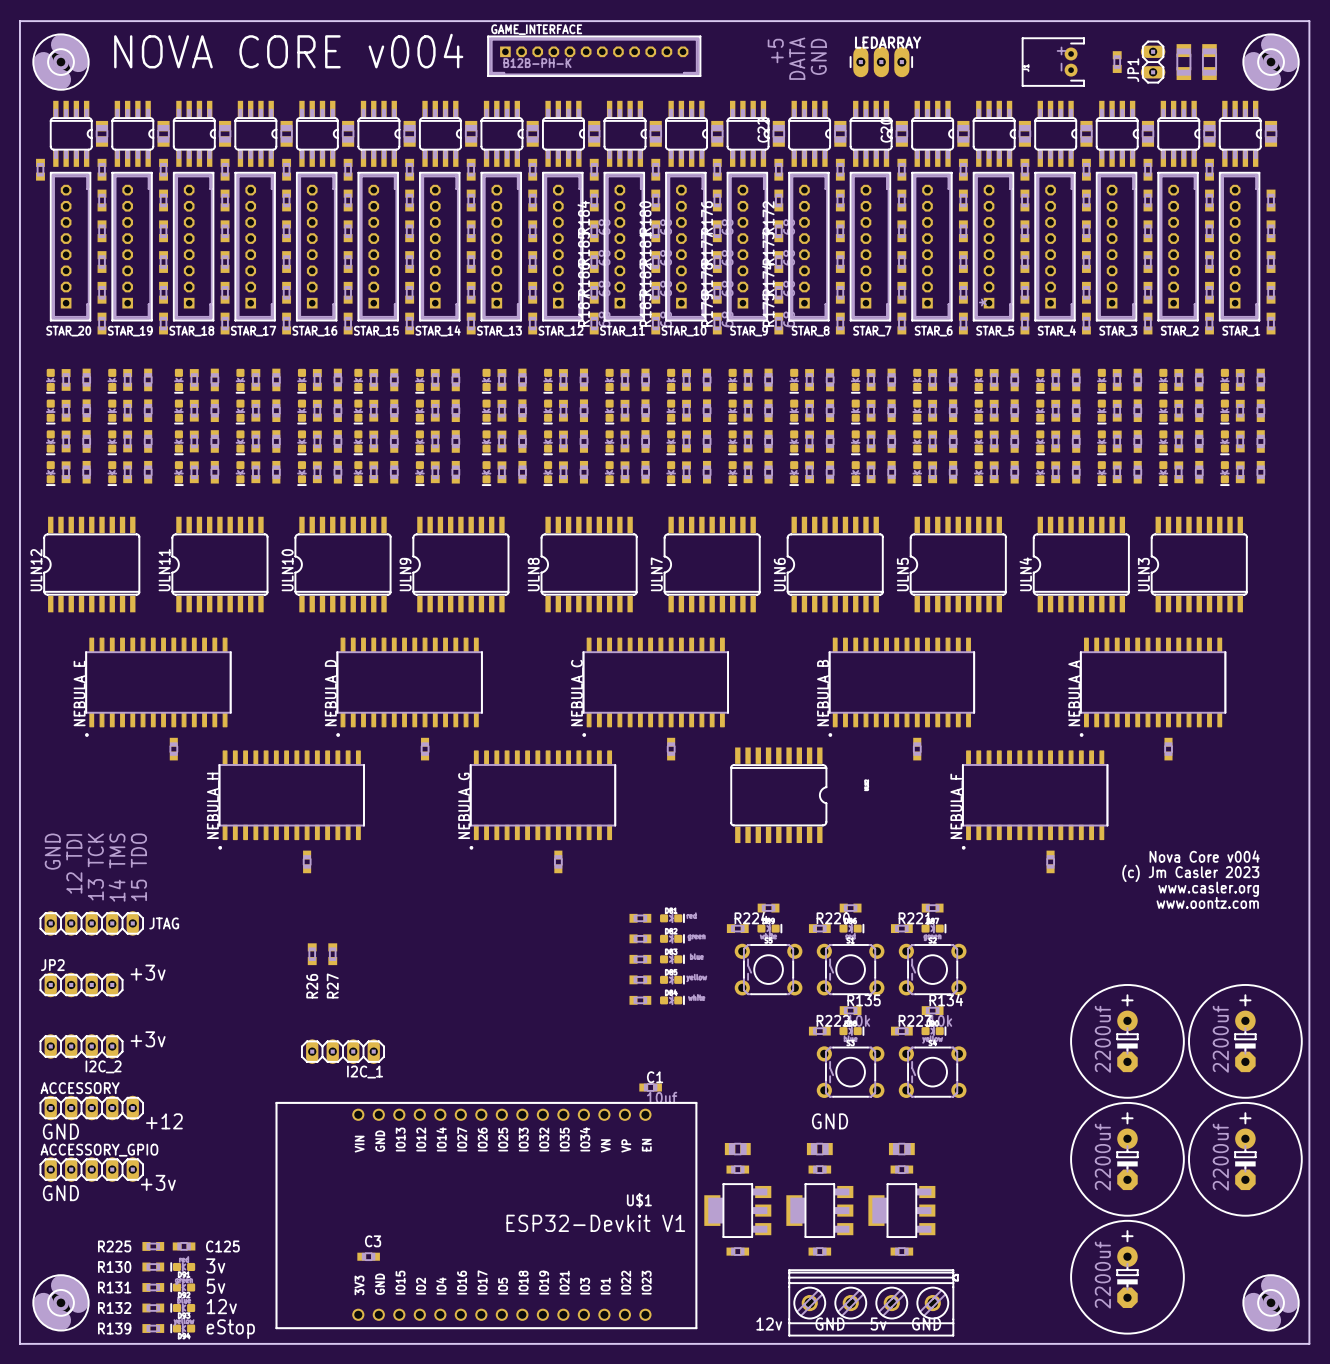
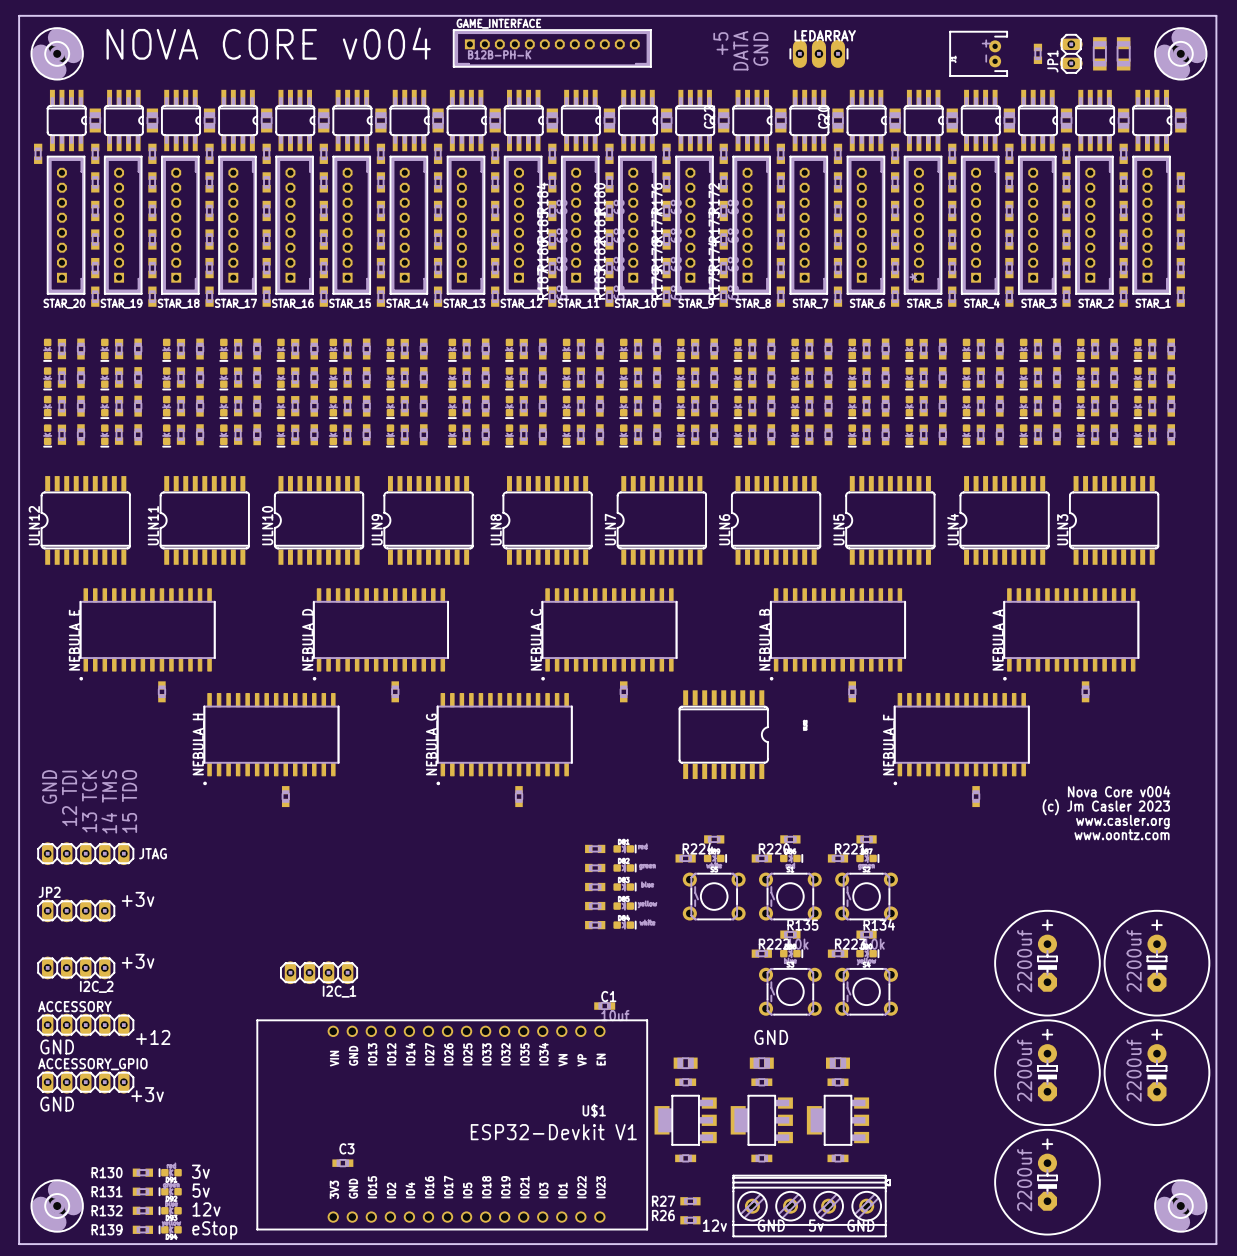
R26 rotation: 0° (312, 954) -> 90° clockwise (690, 1220)
R26 position: (312, 954) -> (690, 1220)
R27 rotation: 0° (332, 954) -> 90° clockwise (690, 1201)
R27 position: (332, 954) -> (690, 1201)
R225: (153, 1246) -> none
C125: (184, 1246) -> none

